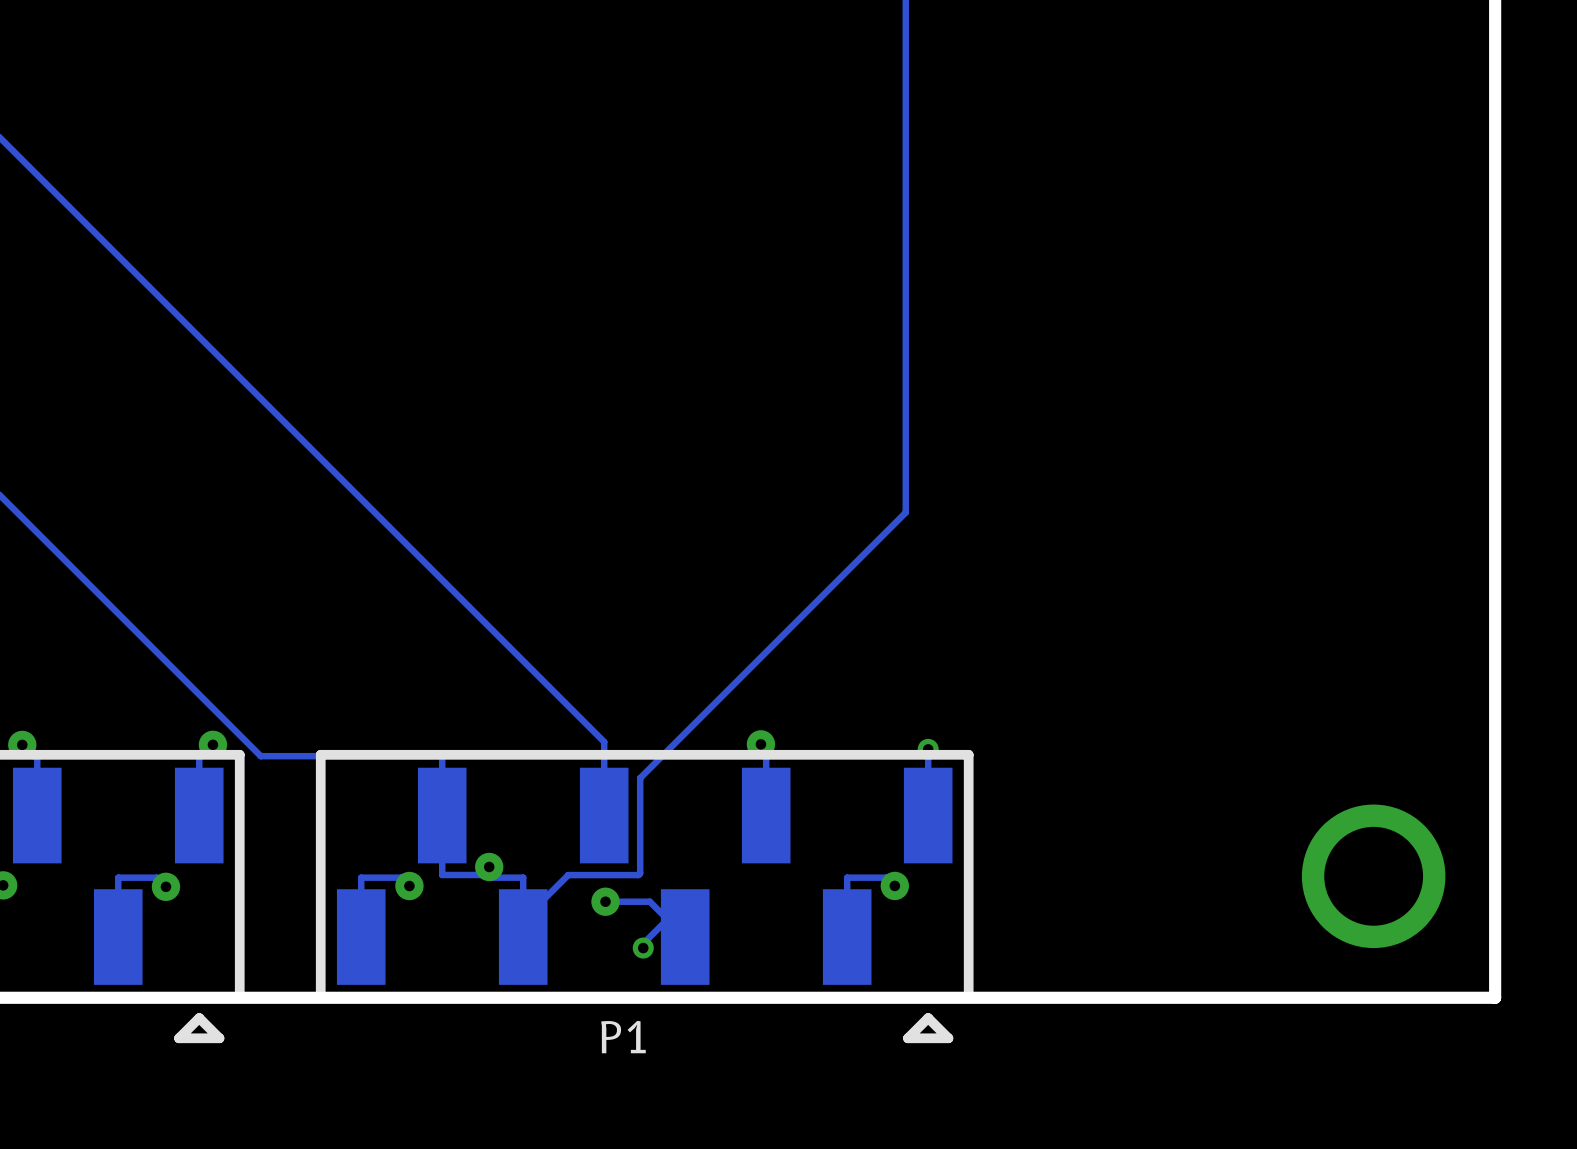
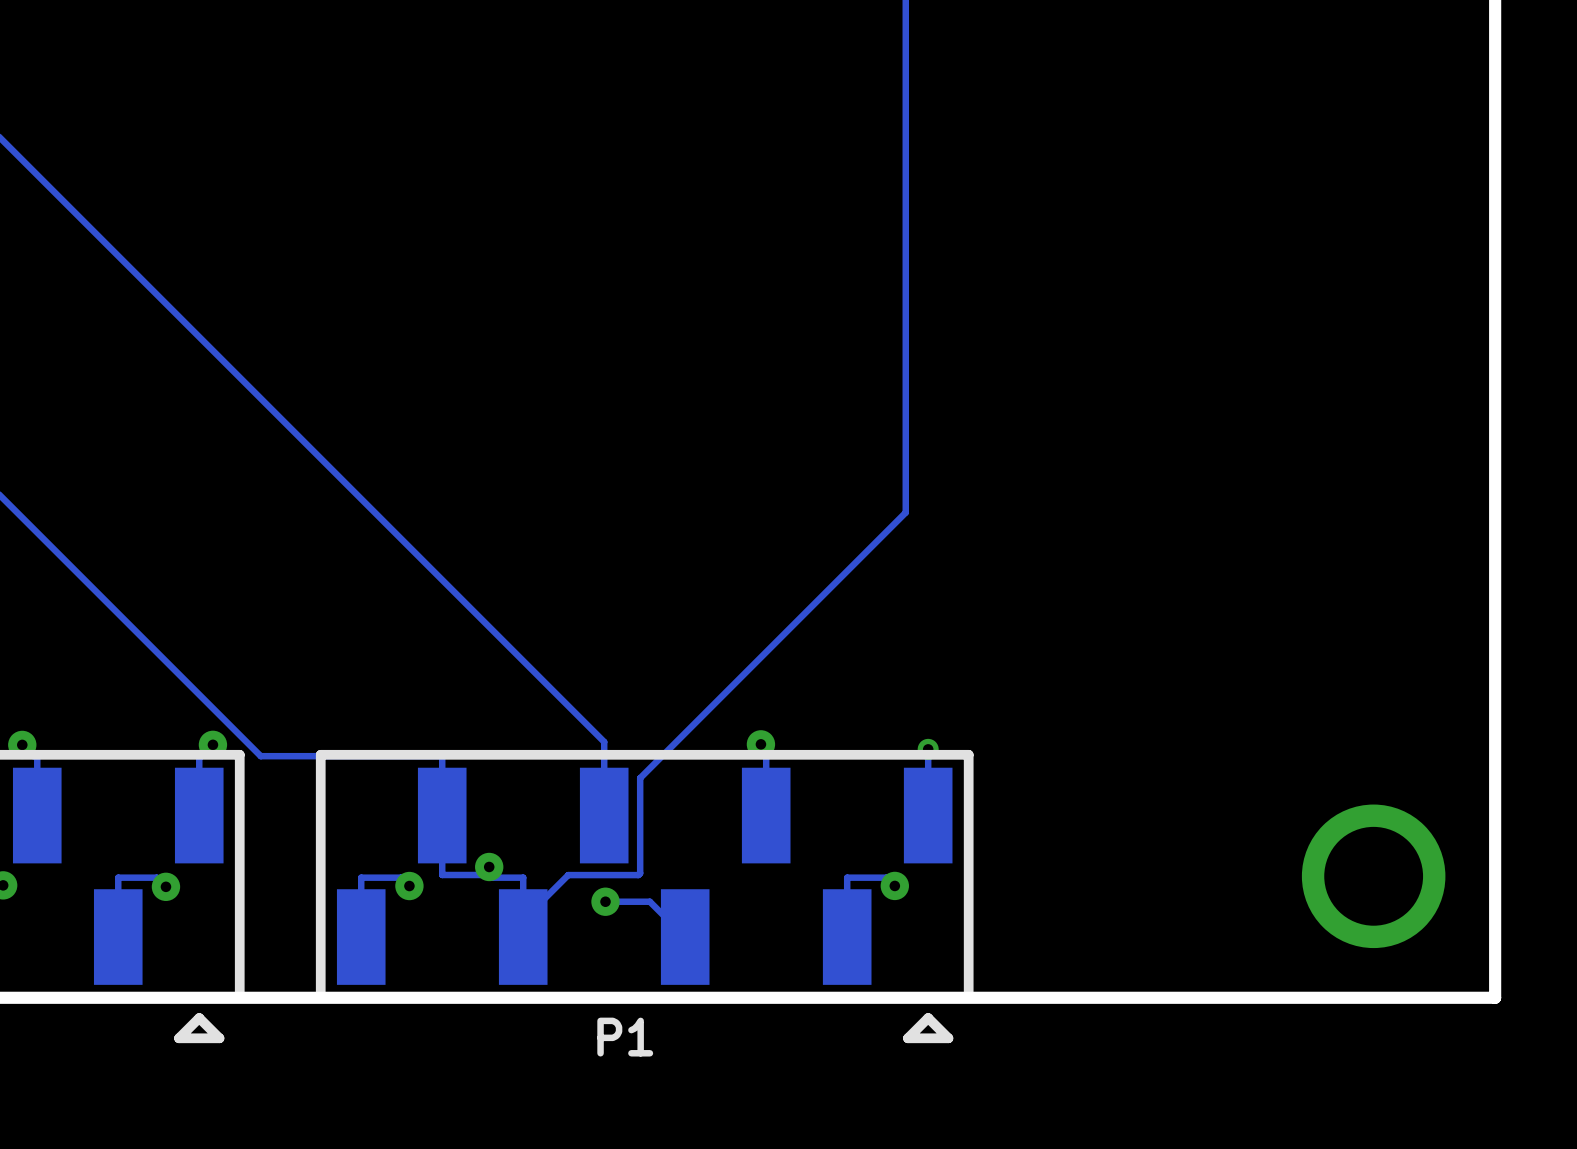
track: (667, 919) (643, 943) (643, 948) -> none
via: (643, 948) -> none

